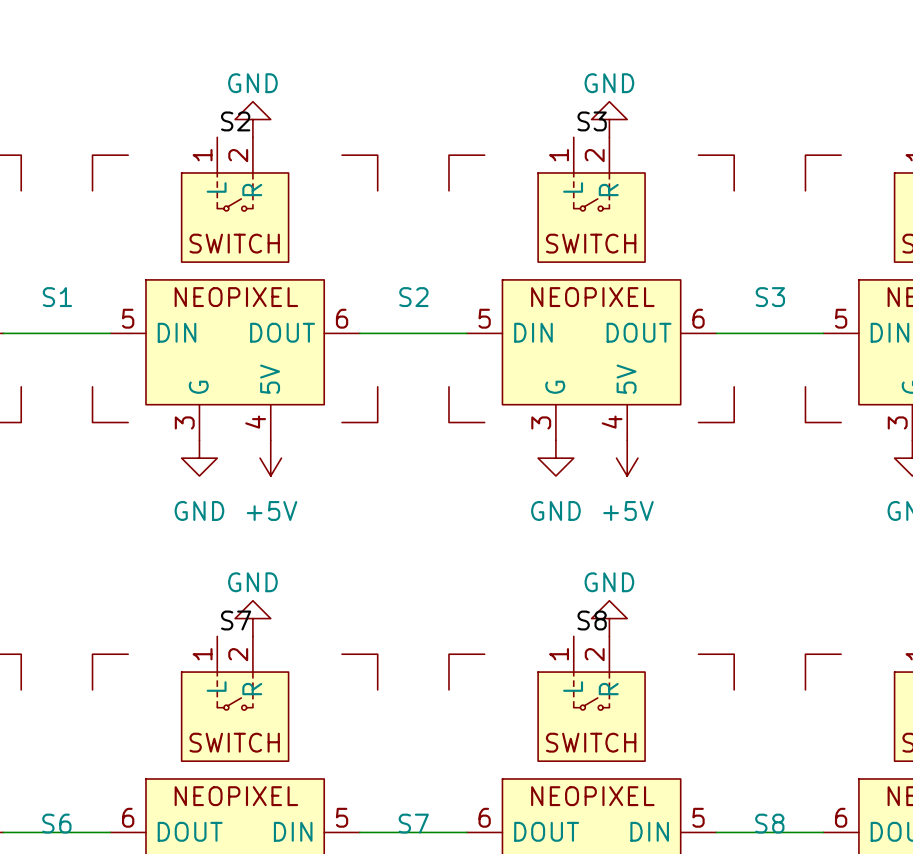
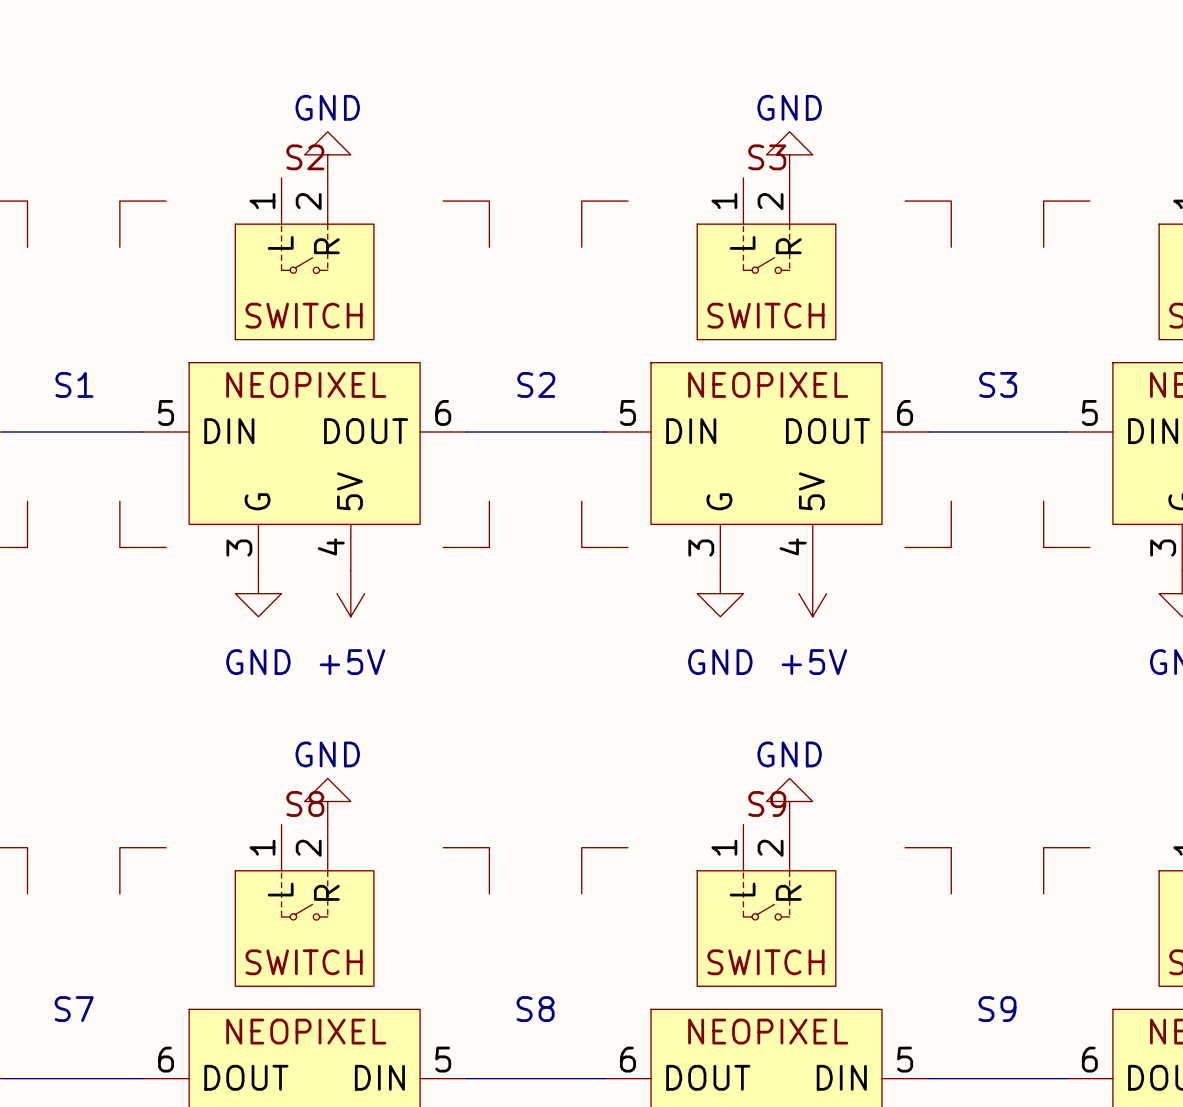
label: S7 (236, 620) -> S8 (305, 803)
label: S8 (592, 620) -> S9 (767, 803)
S6 name: S6 (56, 823) -> S7 (74, 1009)
S7 name: S7 (413, 823) -> S8 (535, 1009)
S8 name: S8 (769, 823) -> S9 (997, 1009)

